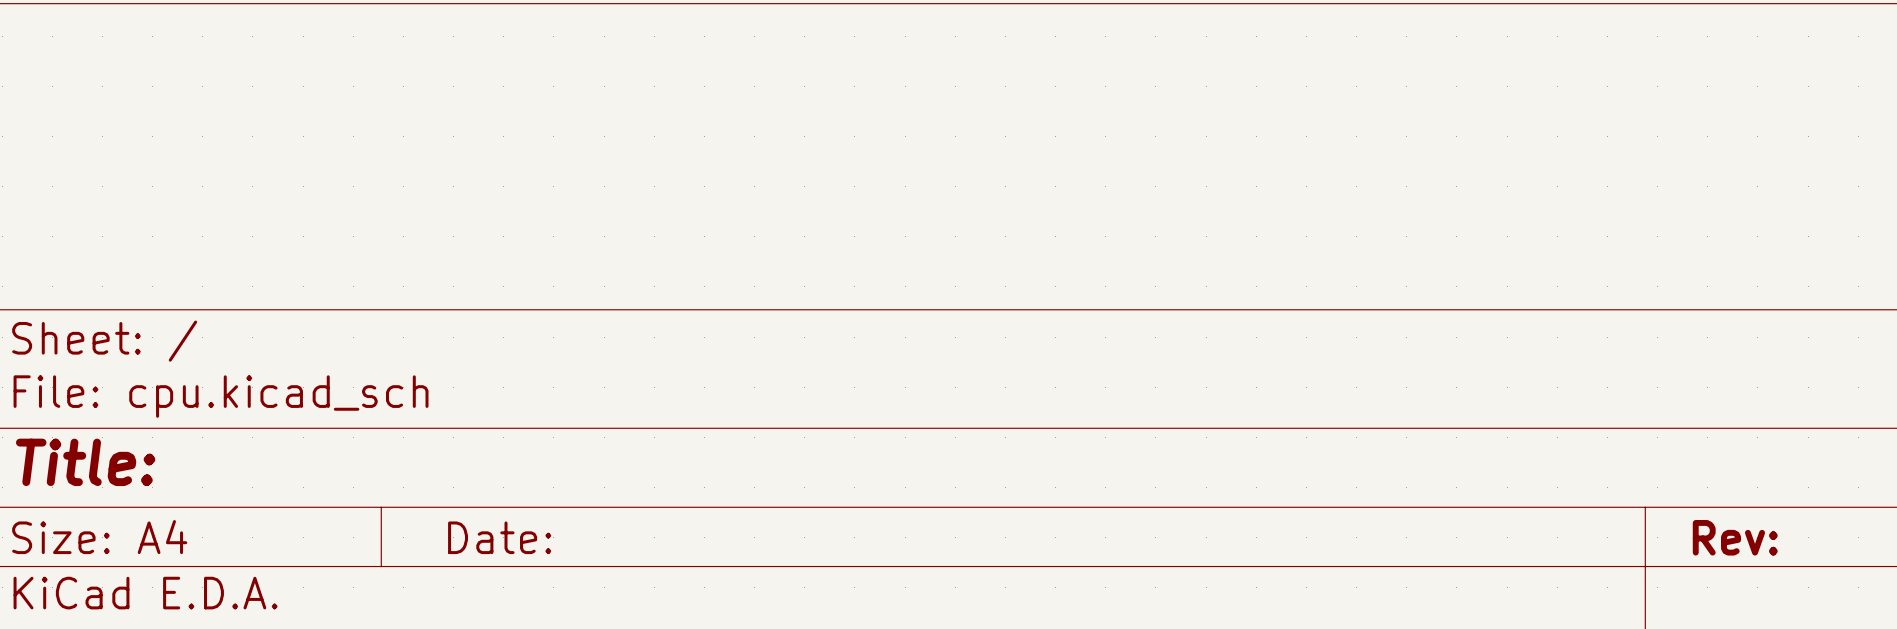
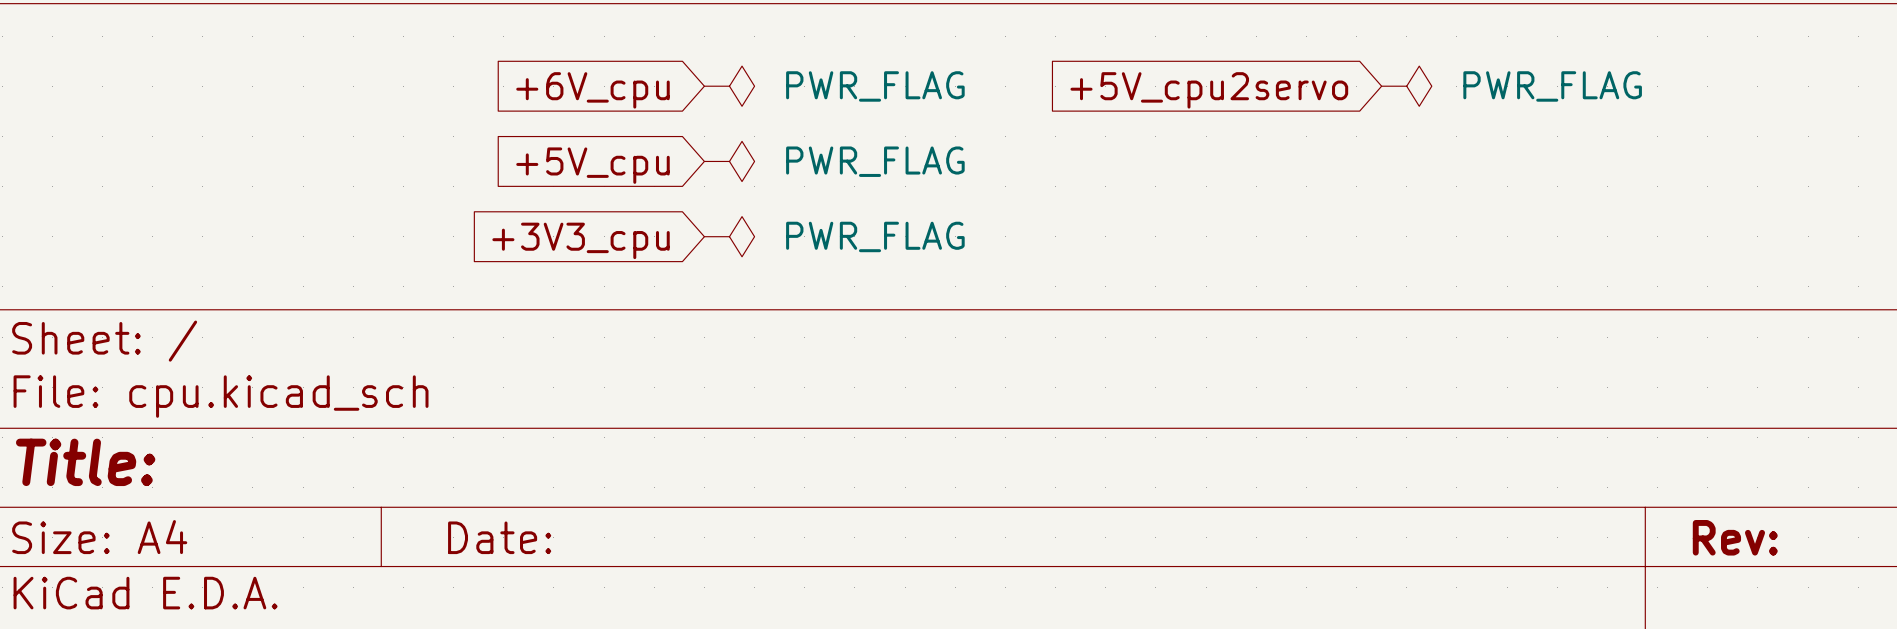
power symbol: none -> PWR_FLAG (729, 86)
power symbol: none -> PWR_FLAG (1406, 86)
global label: none -> +6V_cpu (592, 90)
global label: none -> +5V_cpu2servo (1209, 90)
power symbol: none -> PWR_FLAG (729, 161)
global label: none -> +5V_cpu (592, 165)
power symbol: none -> PWR_FLAG (729, 236)
global label: none -> +3V3_cpu (581, 240)

